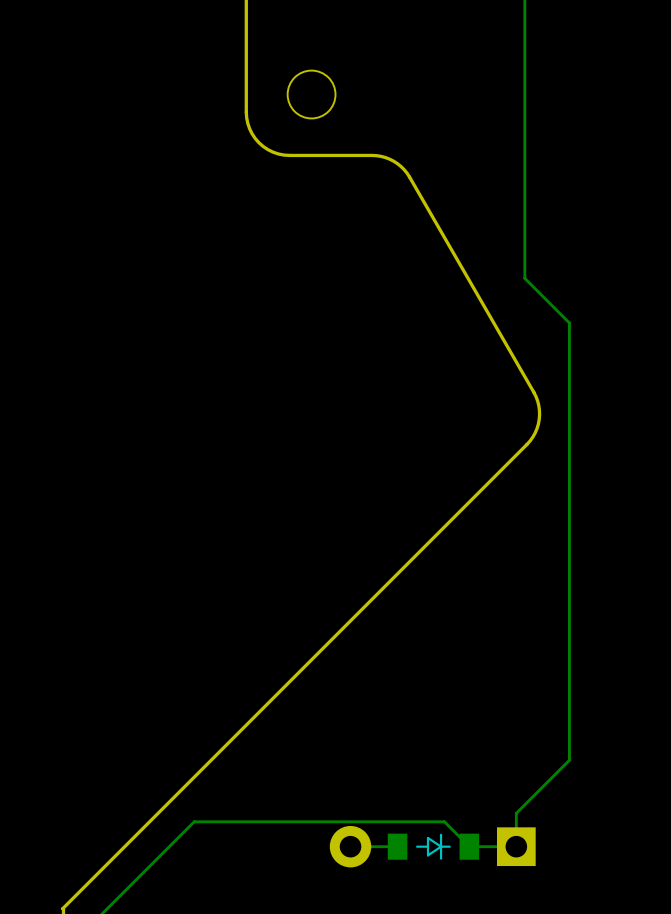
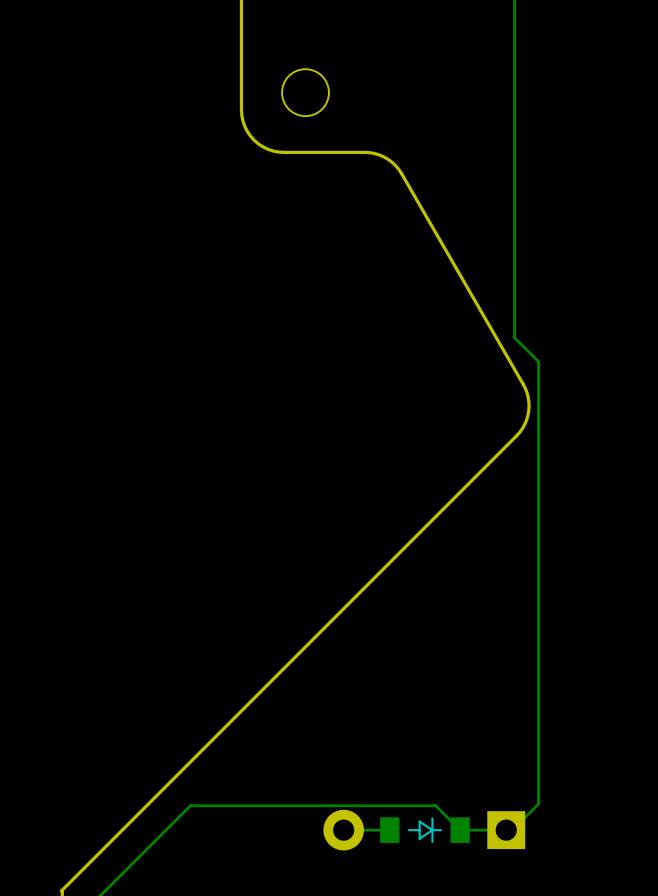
track: (524, 278) (569, 322) (569, 760) (516, 813) (516, 846) -> (514, 272) (514, 337) (538, 361) (538, 803) (512, 830)

